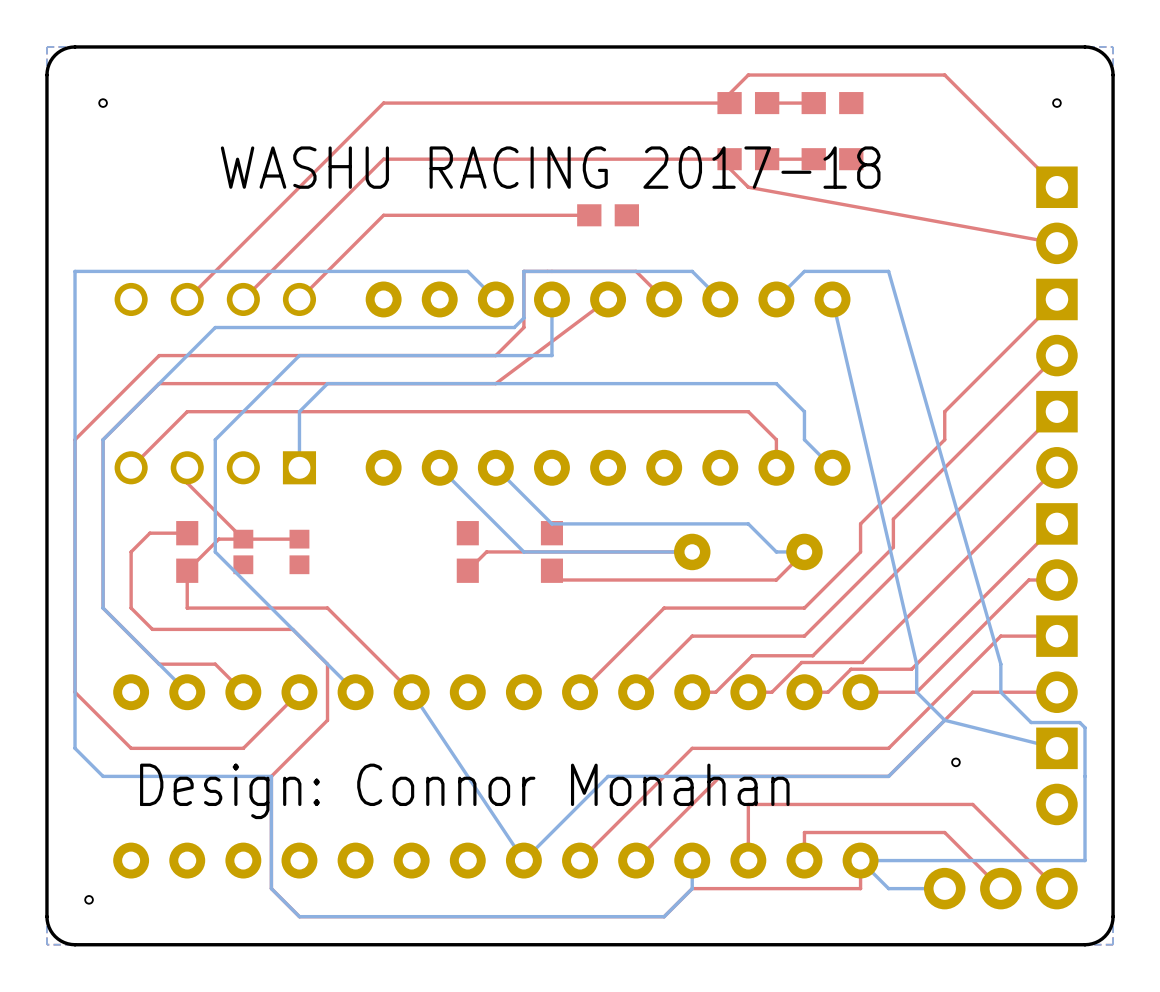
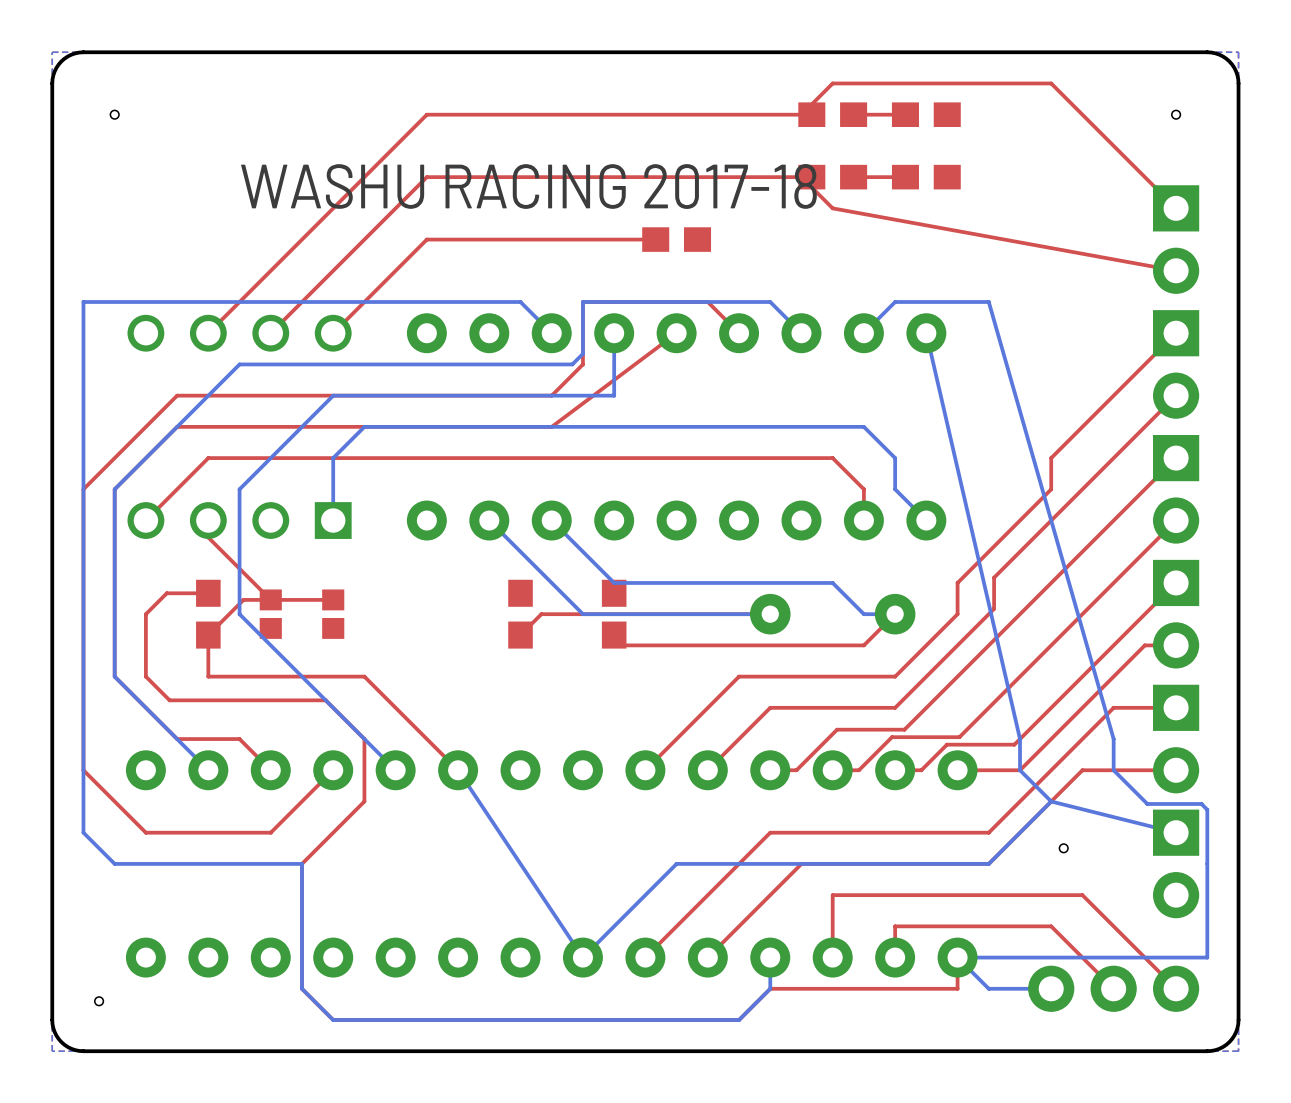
text: Design: Connor Monahan (464, 791) -> none

